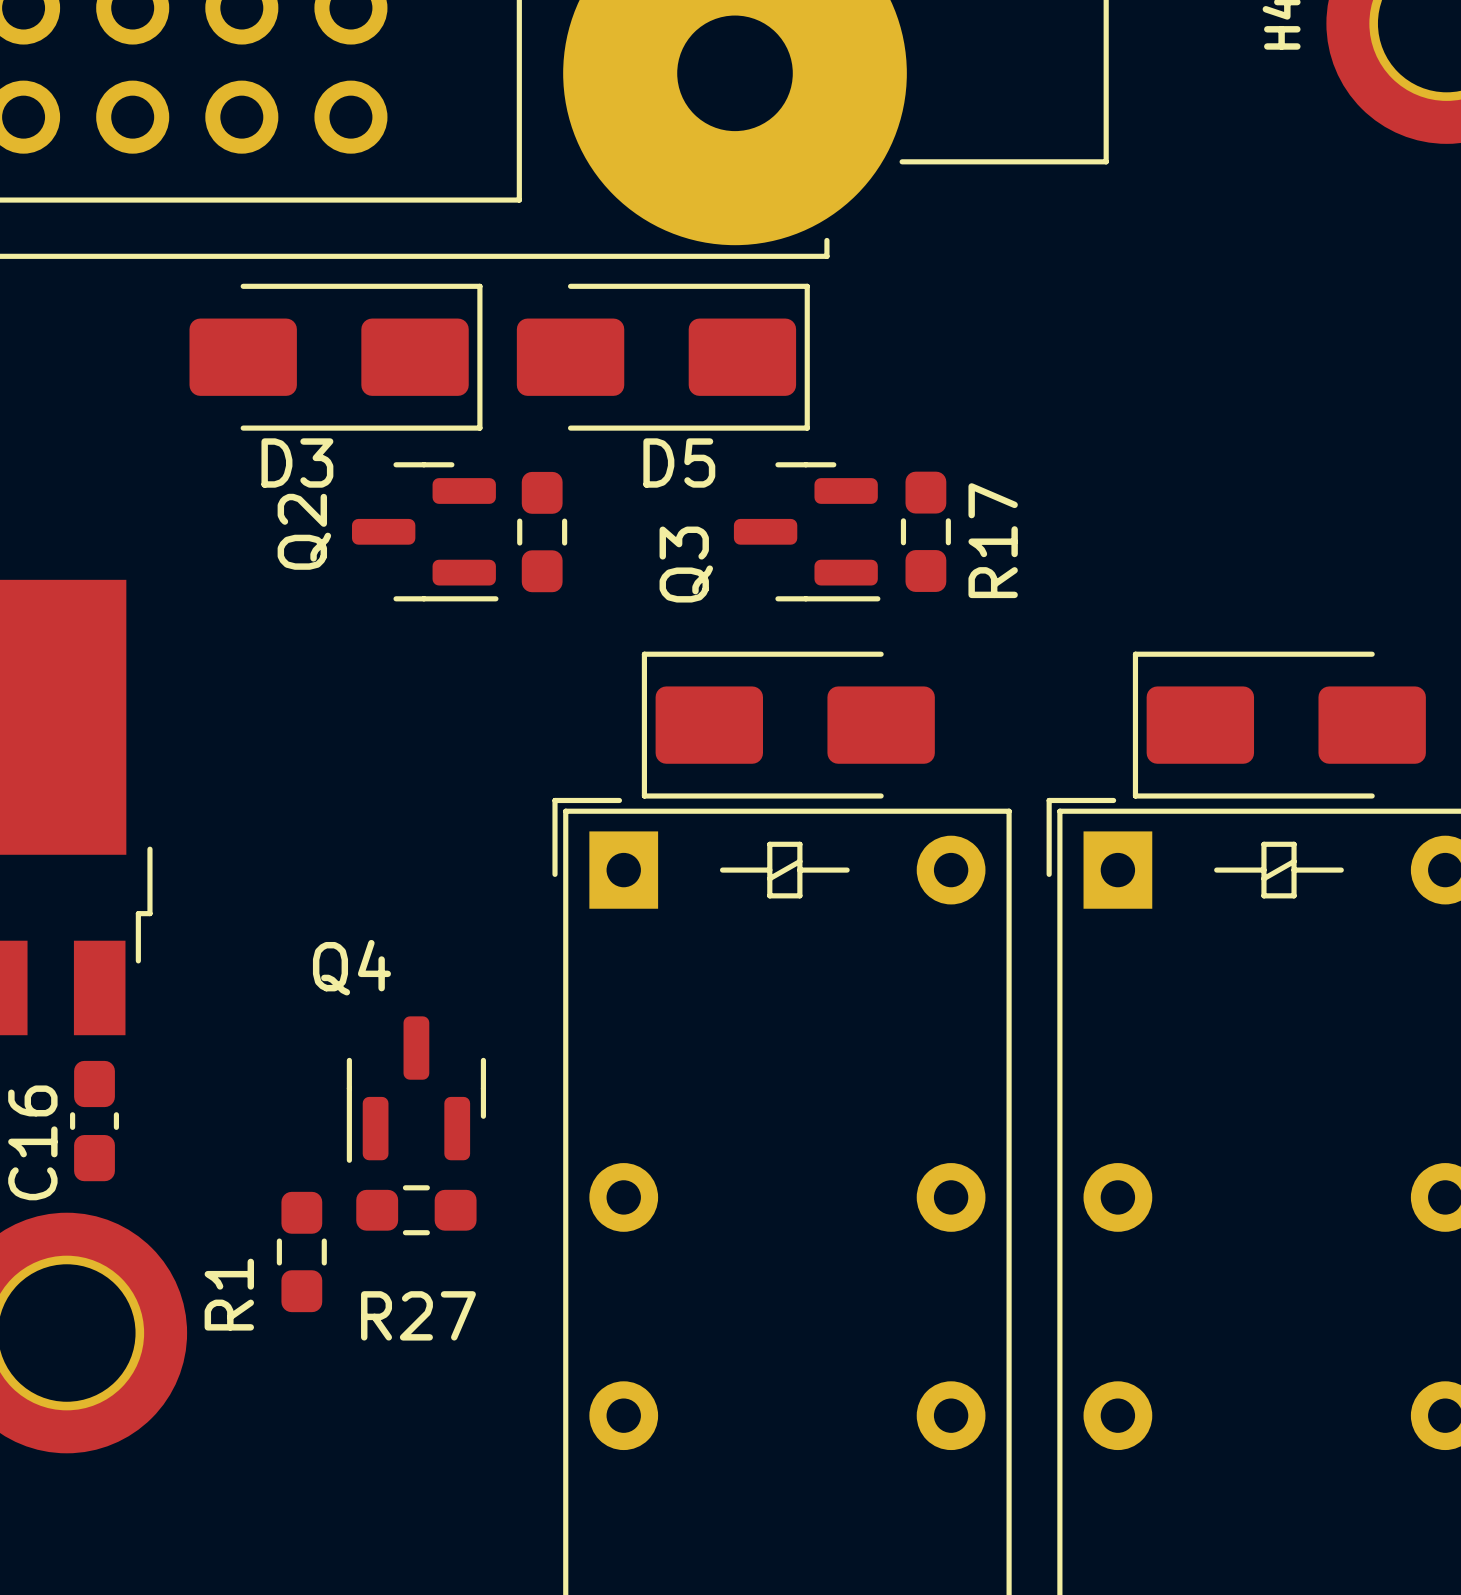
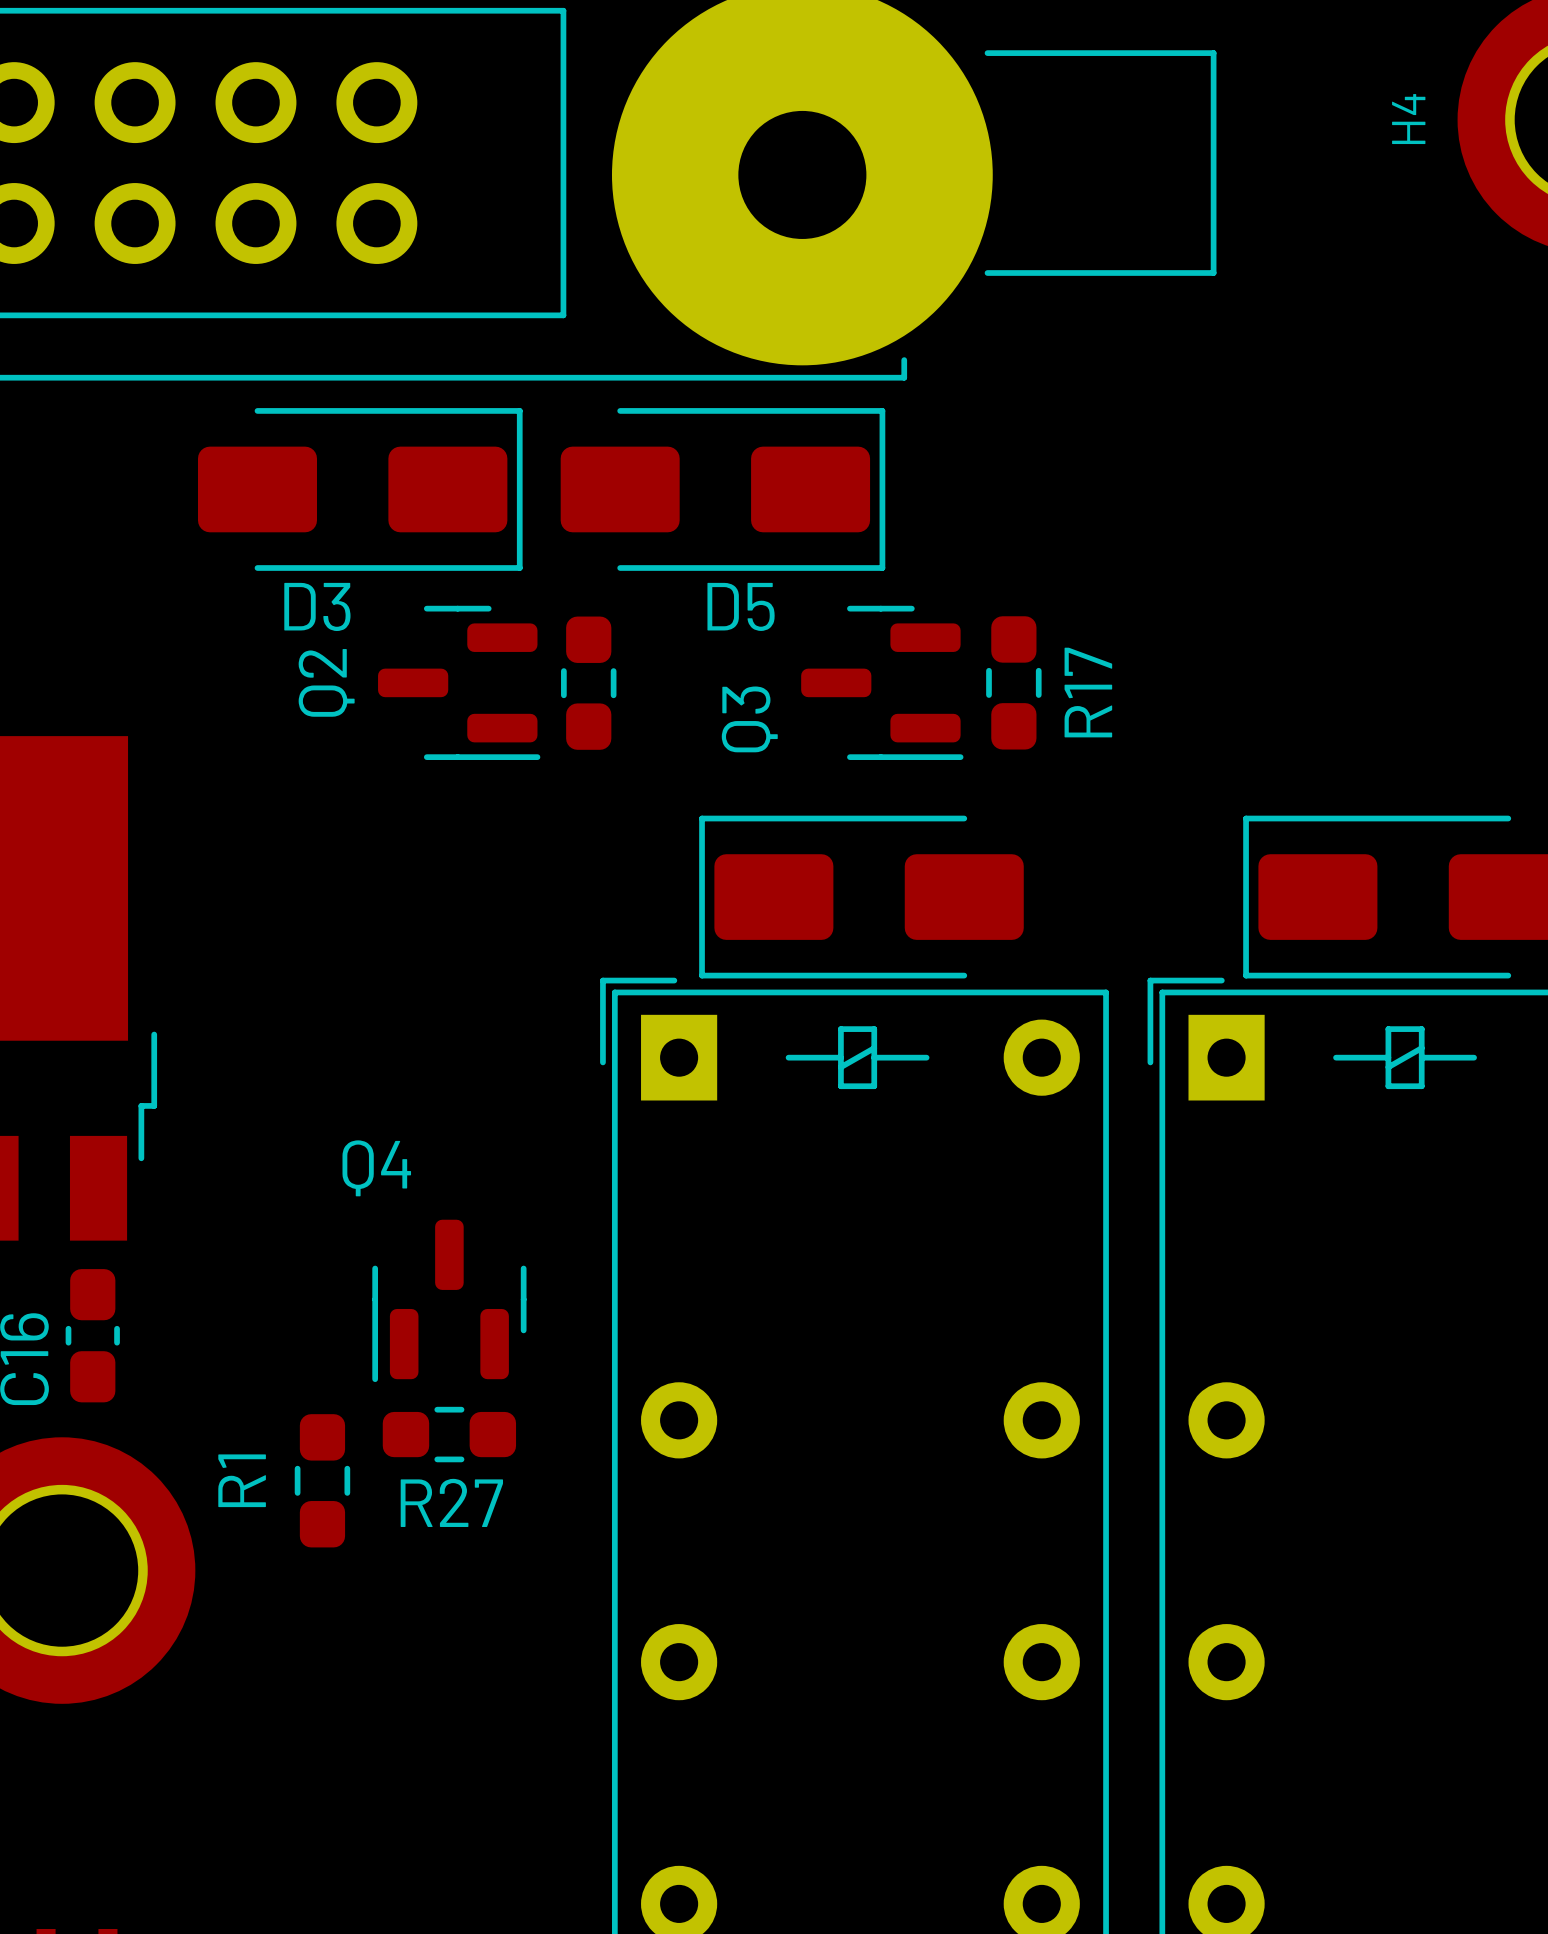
R1 name position: R1 (229, 1294) -> R1 (242, 1480)
R27 name position: R27 (418, 1315) -> R27 (451, 1502)

